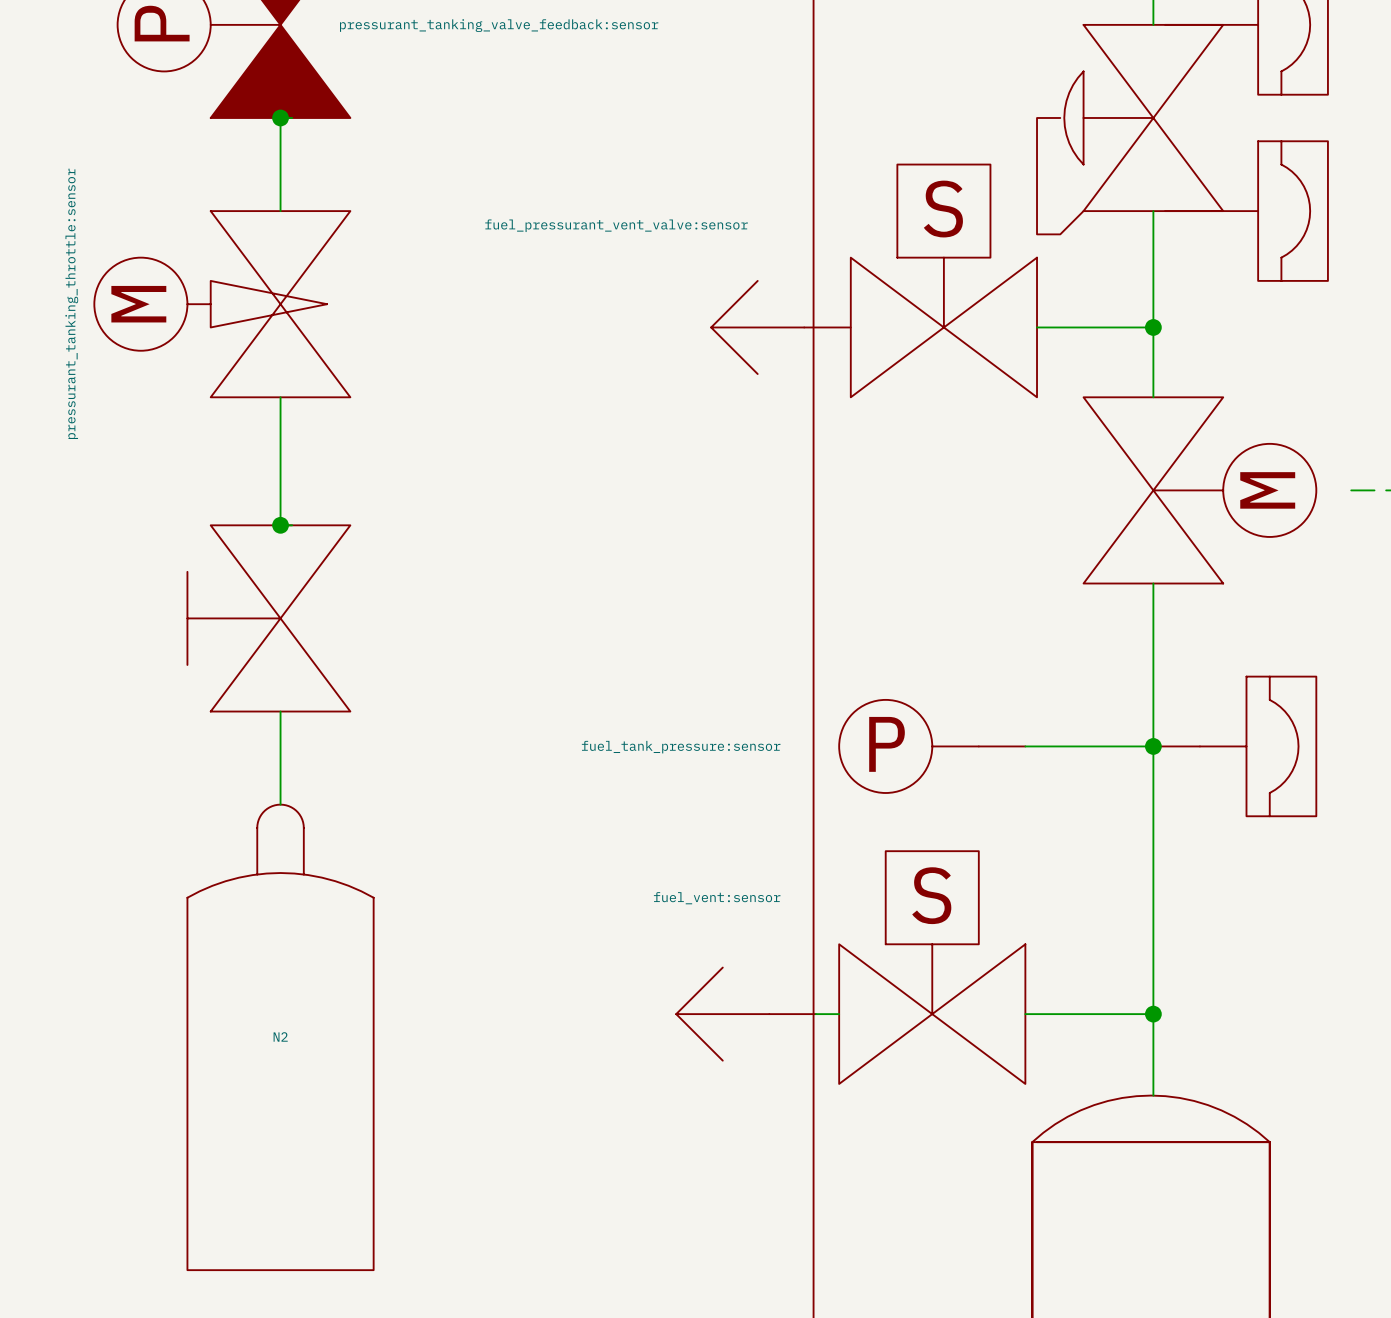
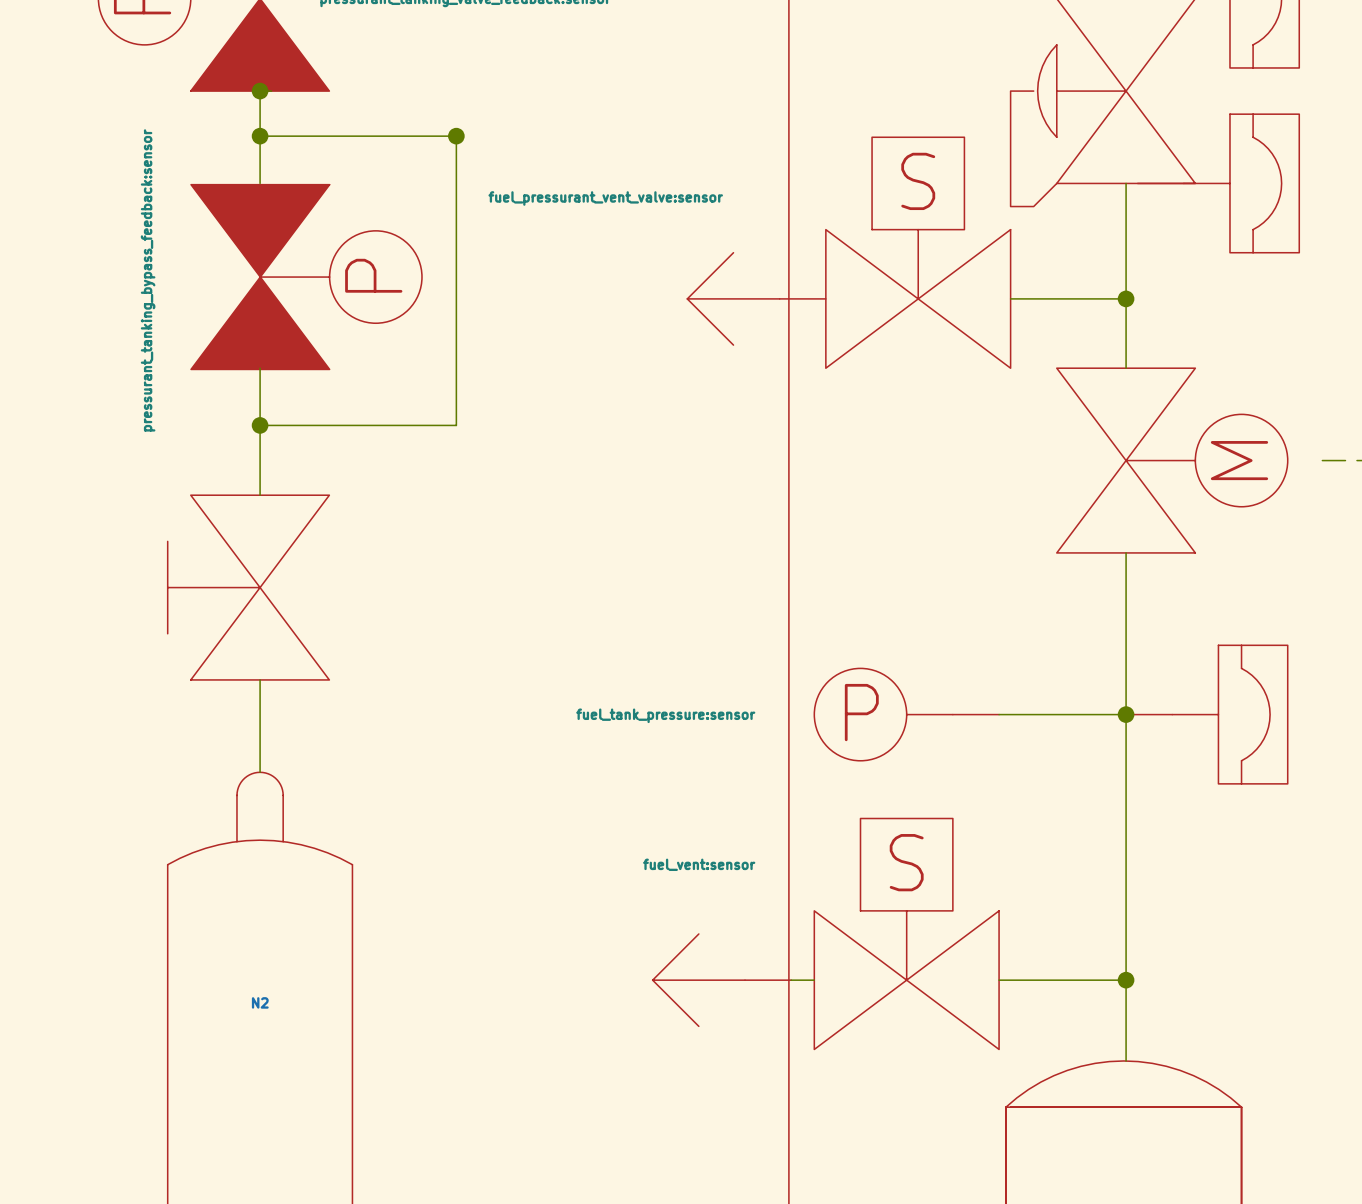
wire: none -> (260, 136) (460, 136)
junction: none -> (260, 136)
wire: none -> (456, 136) (456, 425) (260, 425)
junction: none -> (456, 136)
part: pressurant_tanking_throttle:sensor (222, 304) -> none
part: none -> pressurant_tanking_bypass_feedback:sensor (306, 277)
junction position: (280, 525) -> (260, 425)

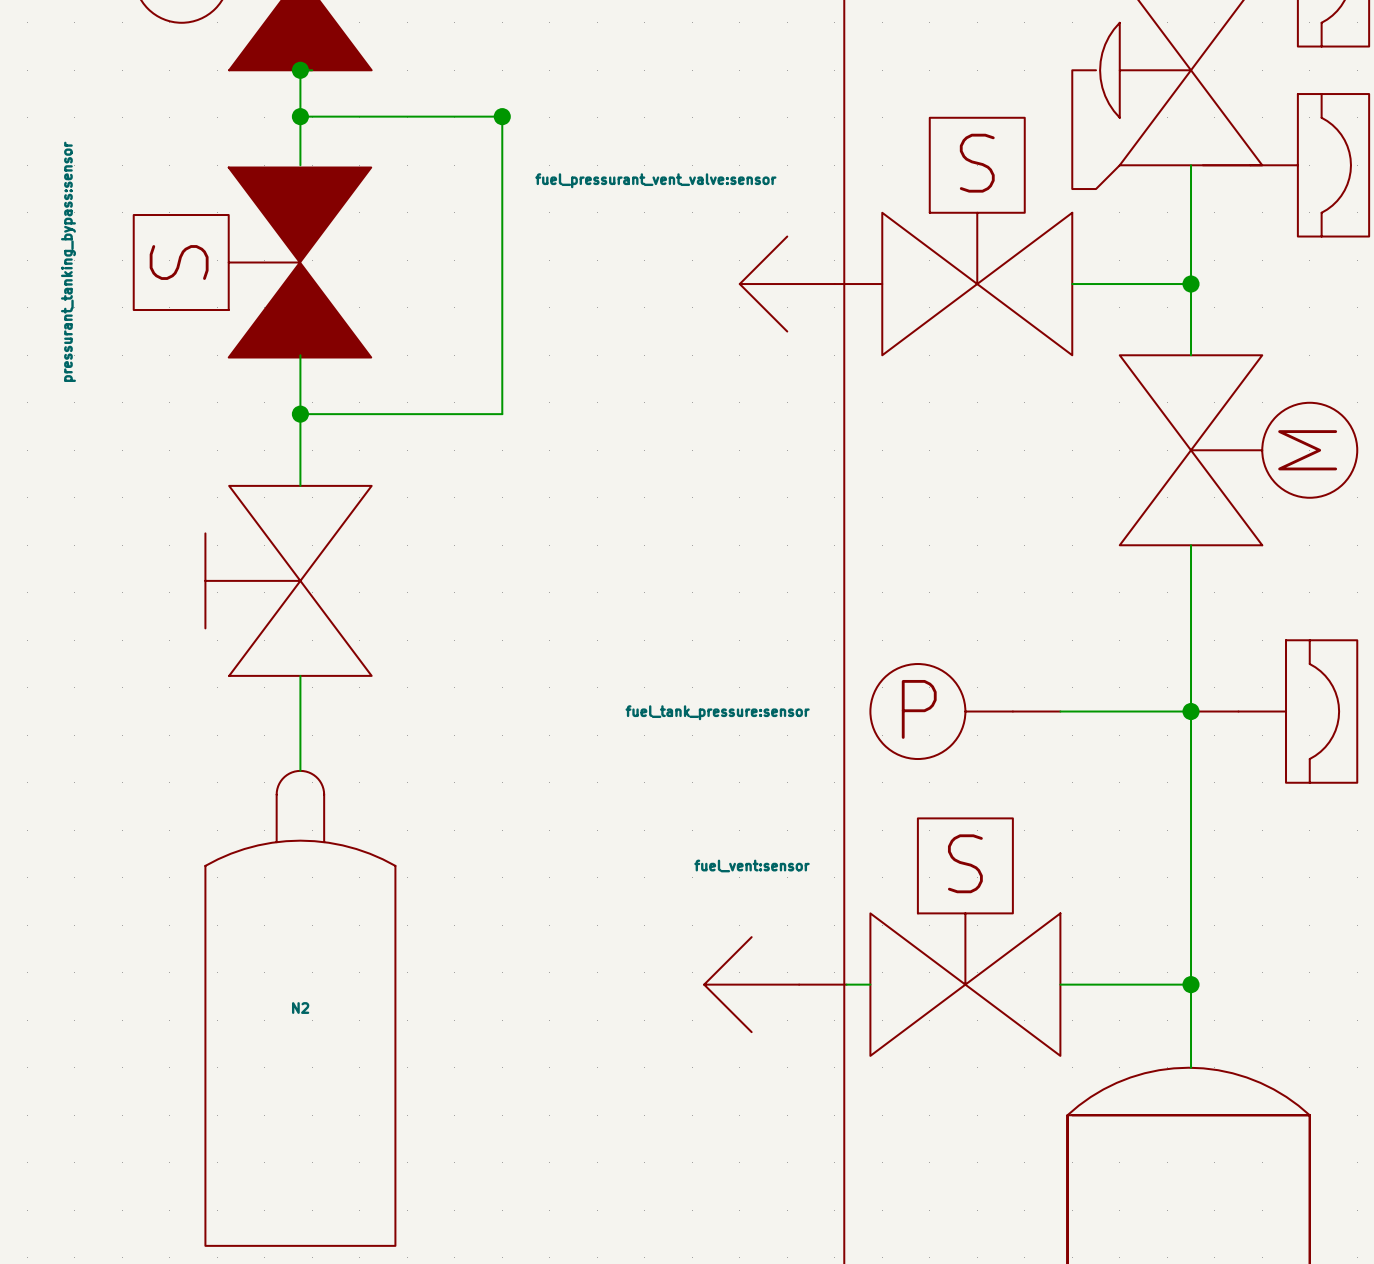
part: none -> pressurant_tanking_bypass:sensor (252, 262)
part: pressurant_tanking_bypass_feedback:sensor (306, 277) -> none

